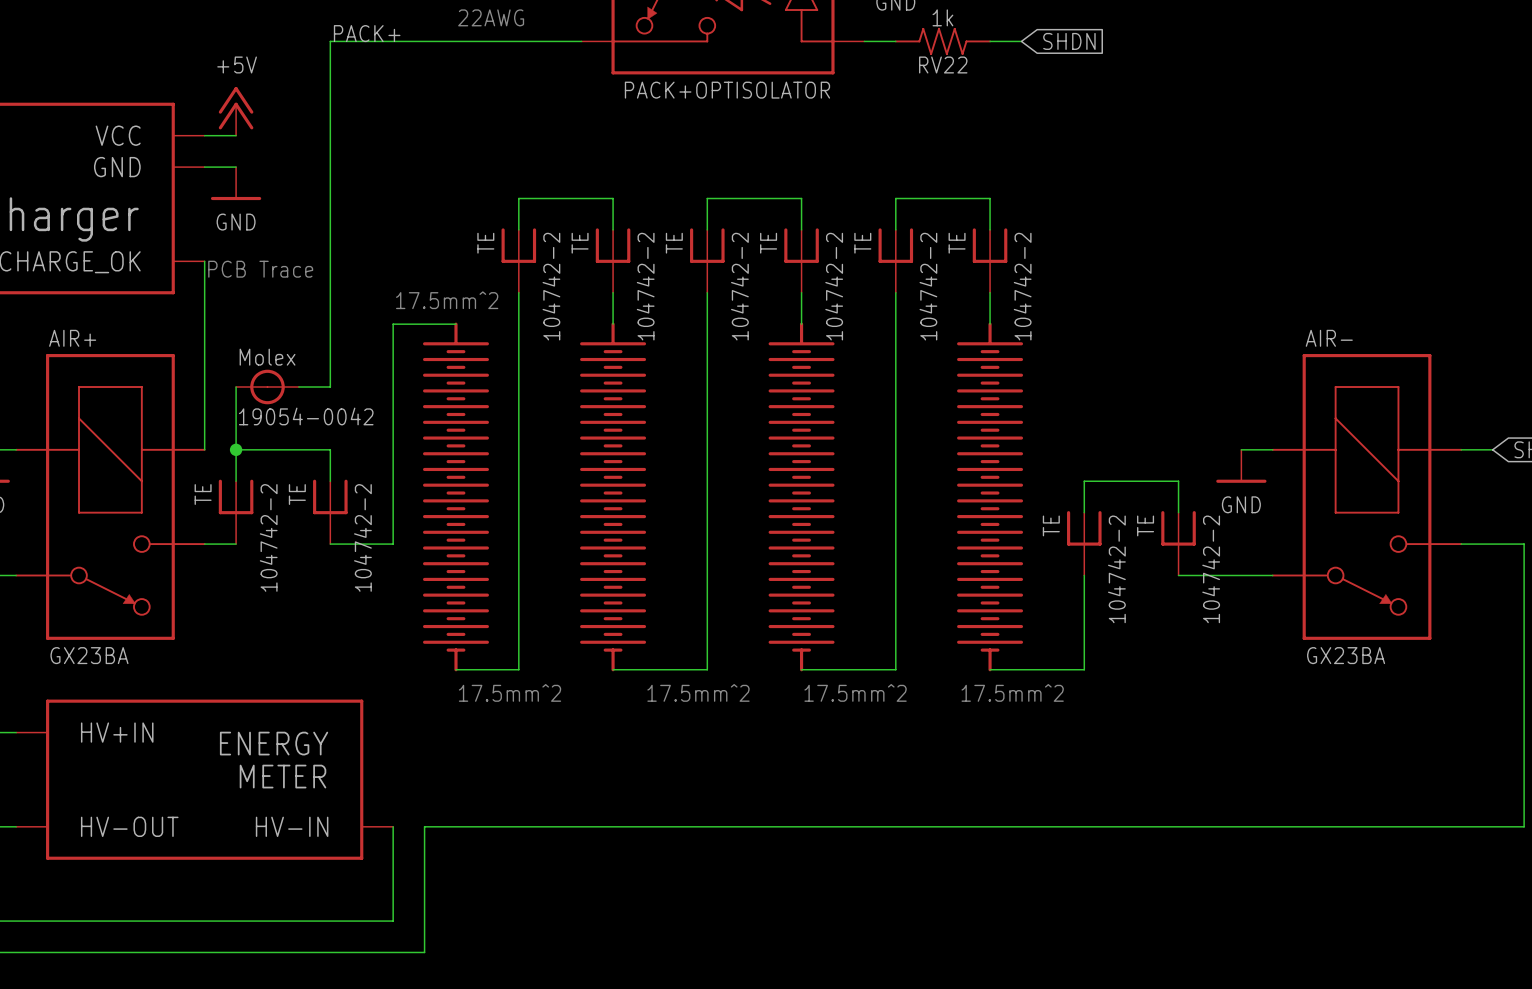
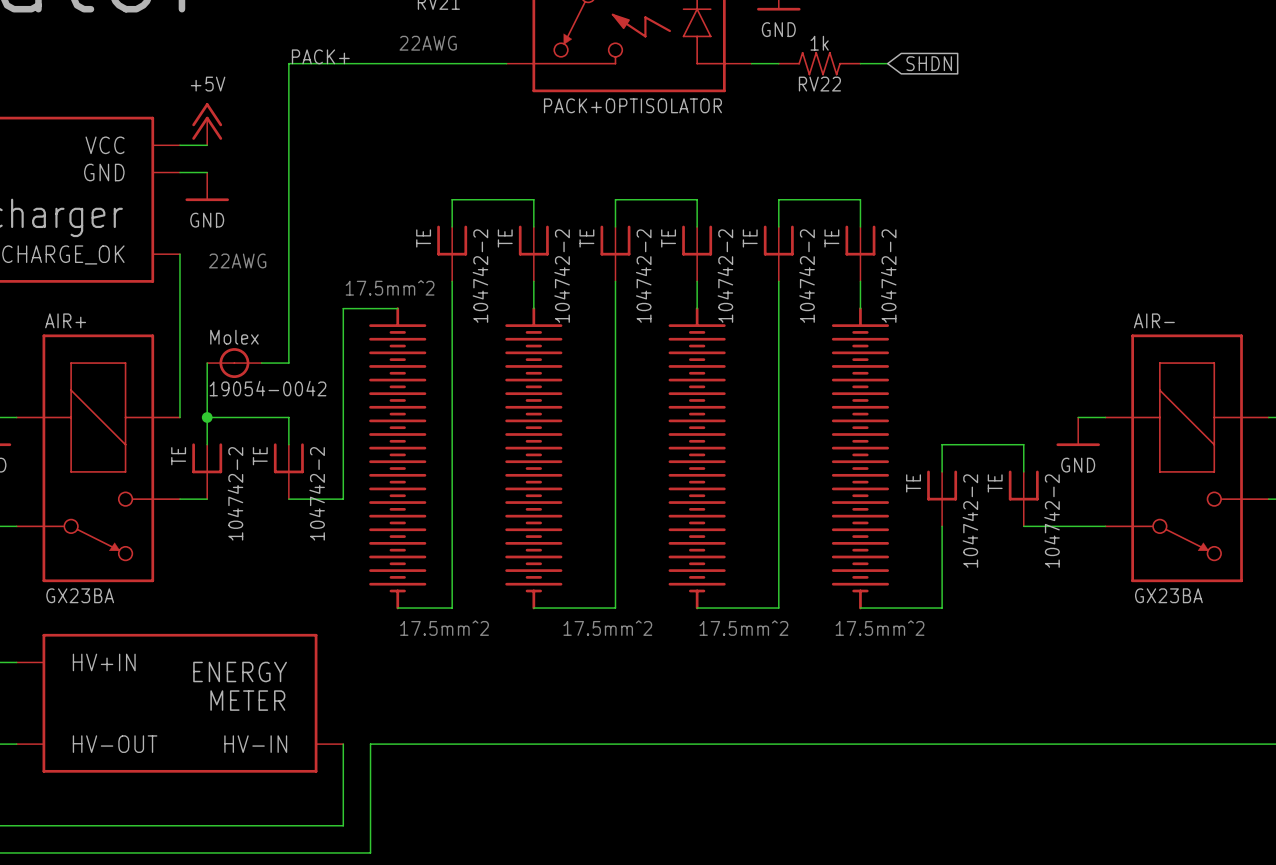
text: PCB Trace (260, 269) -> none
text: none -> 22AWG (237, 260)

